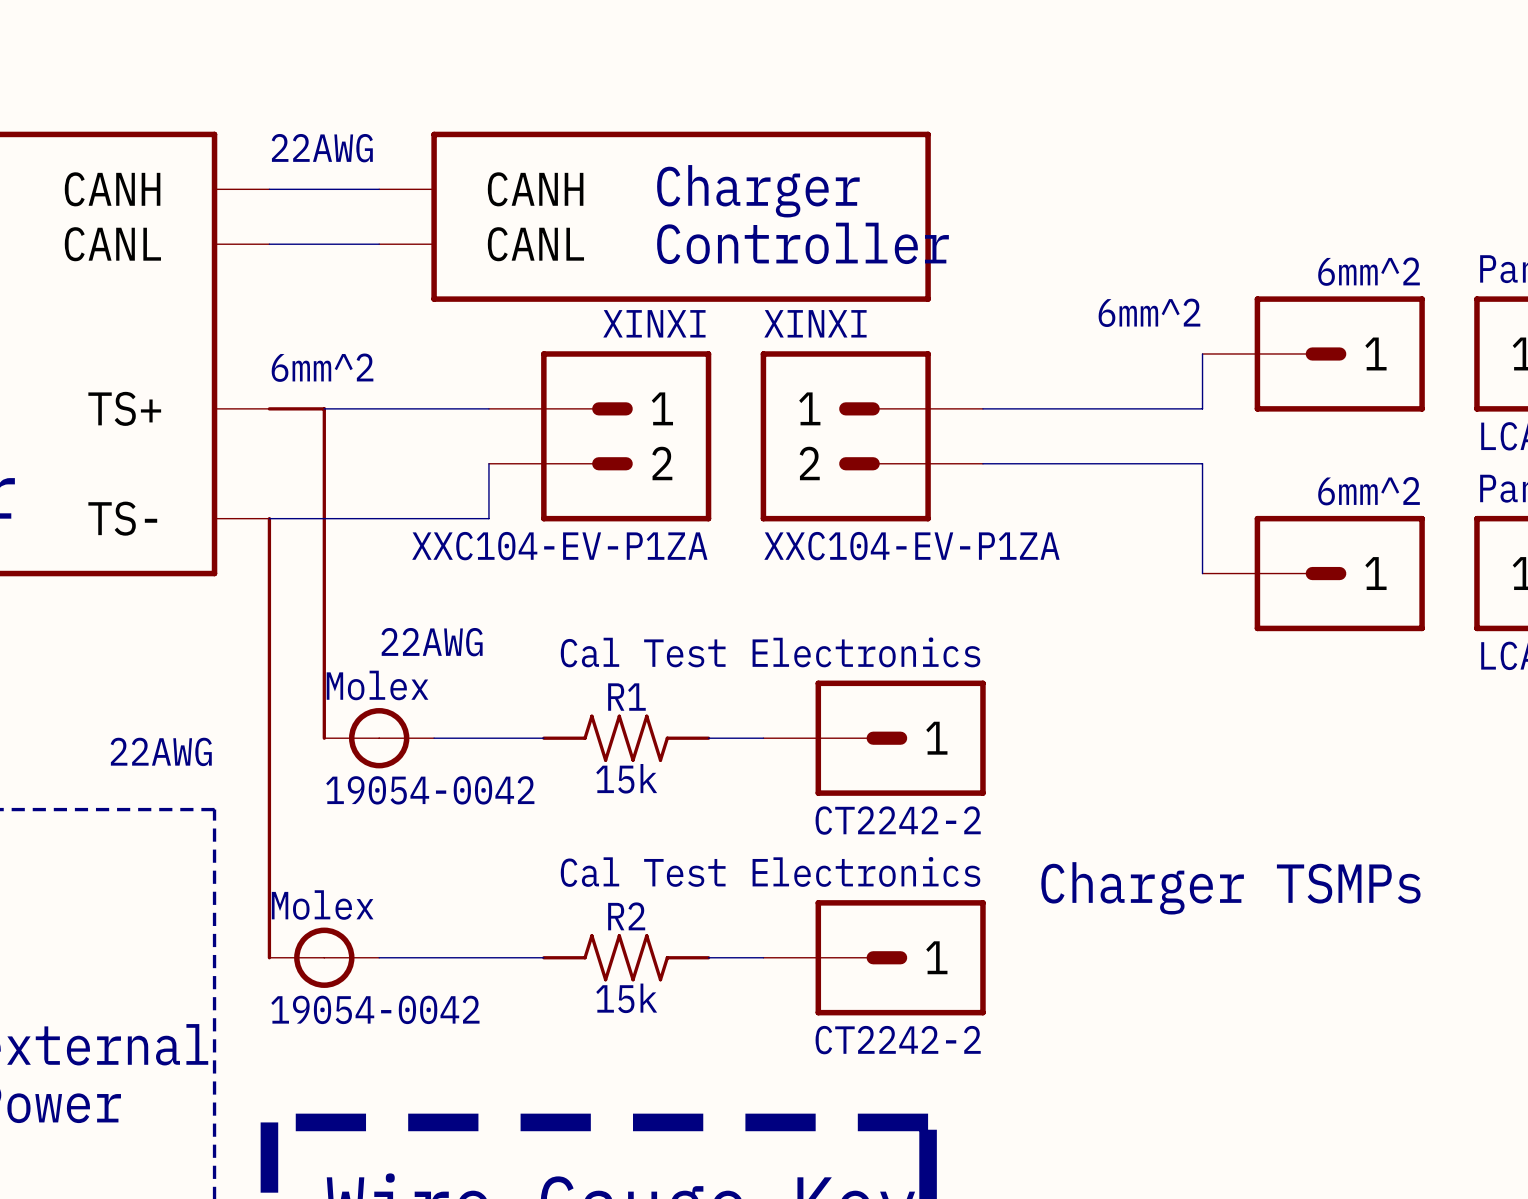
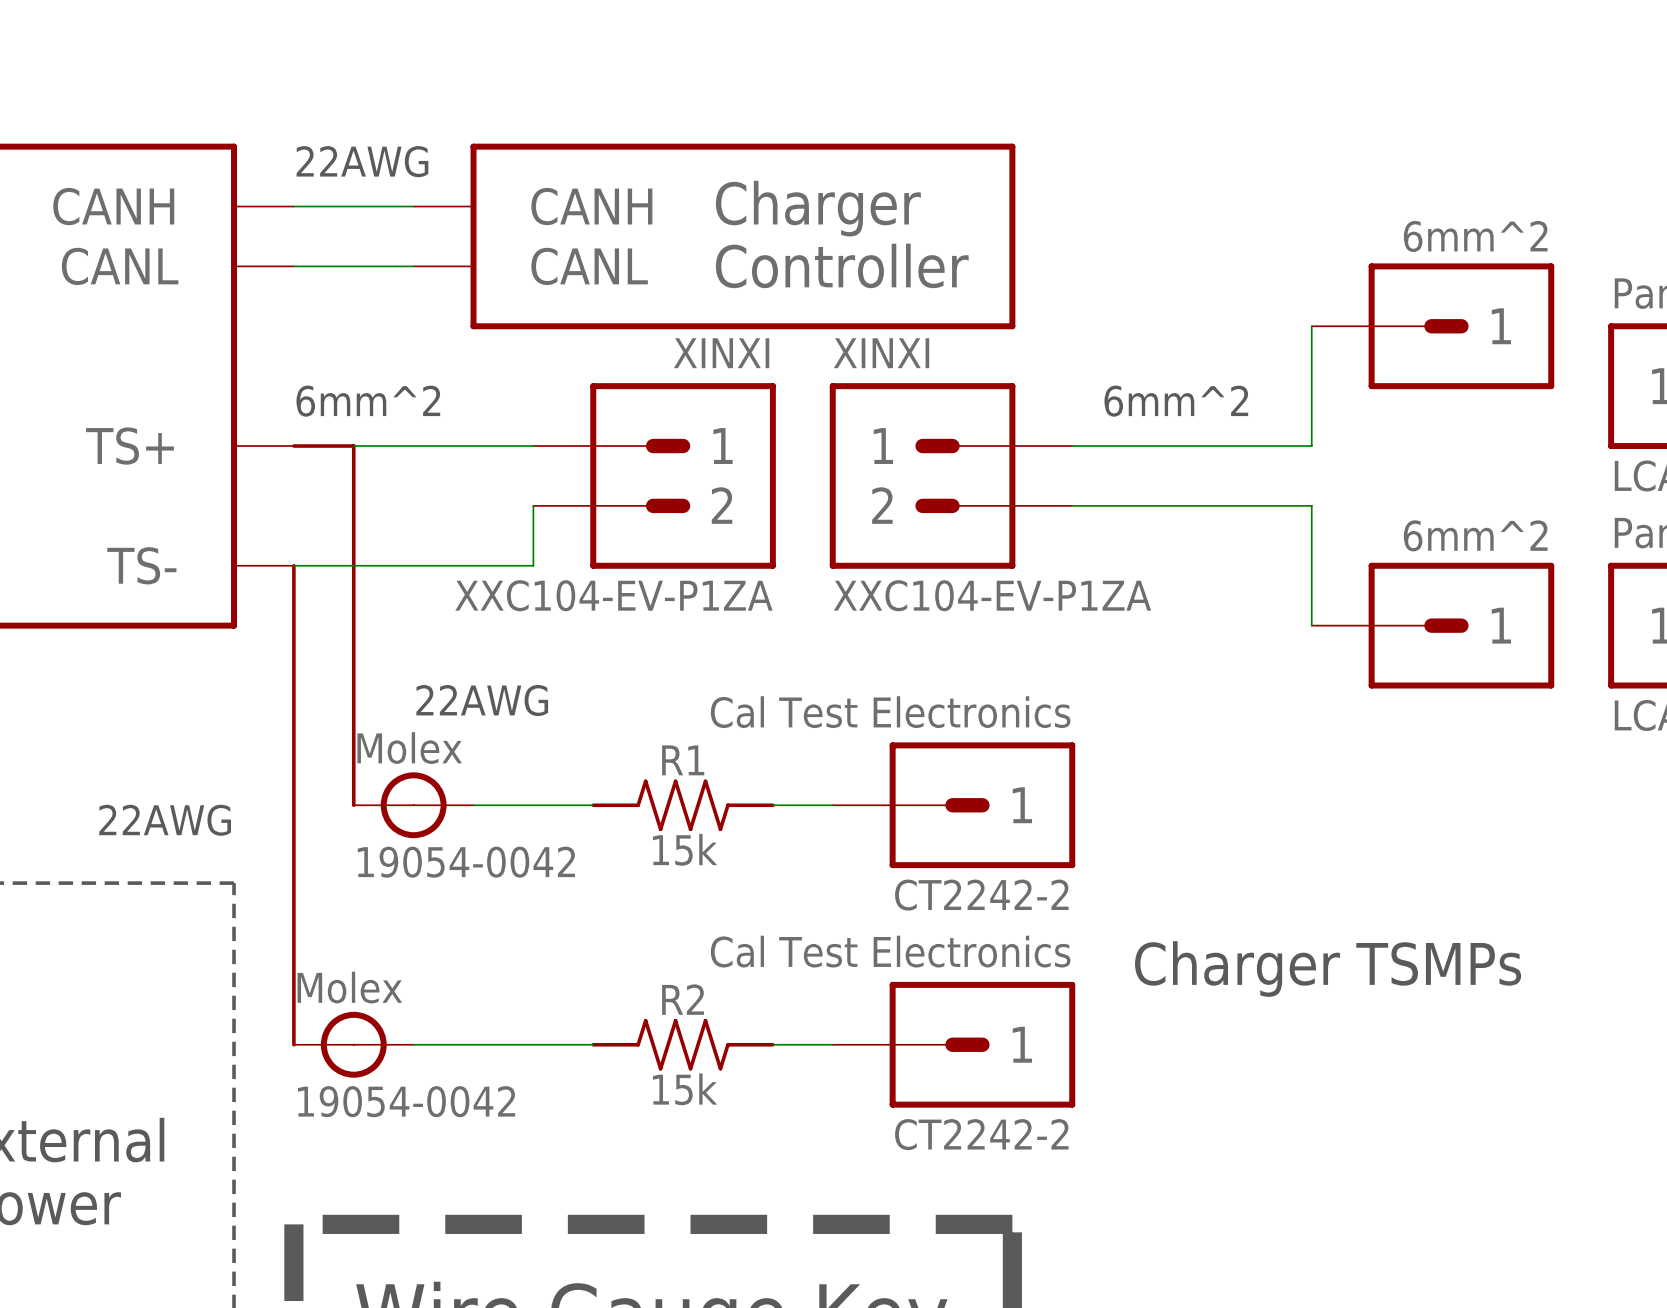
wire: none -> (1311, 326) (1311, 386)
text position: 6mm^2 (1149, 312) -> 6mm^2 (1176, 401)
part position: (1313, 353) -> (1432, 326)

